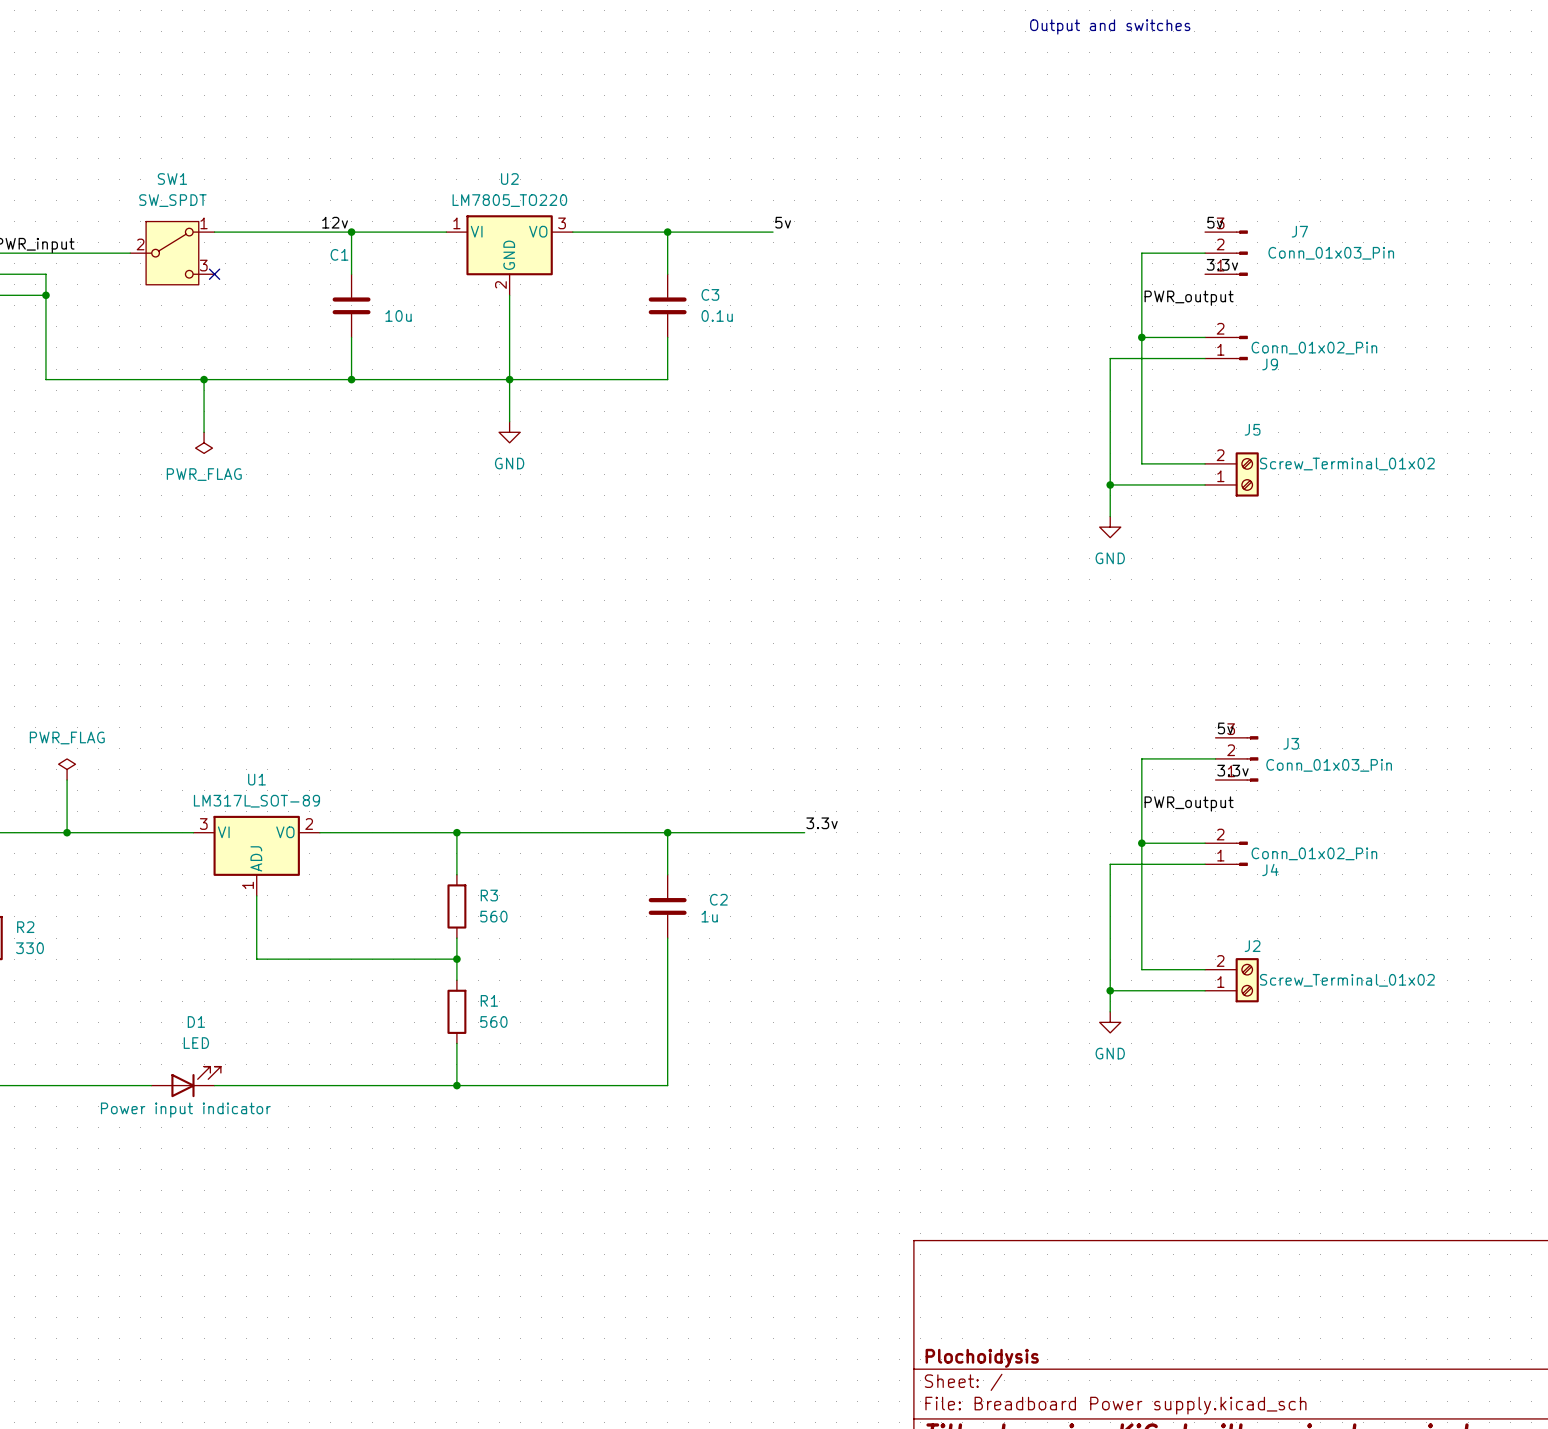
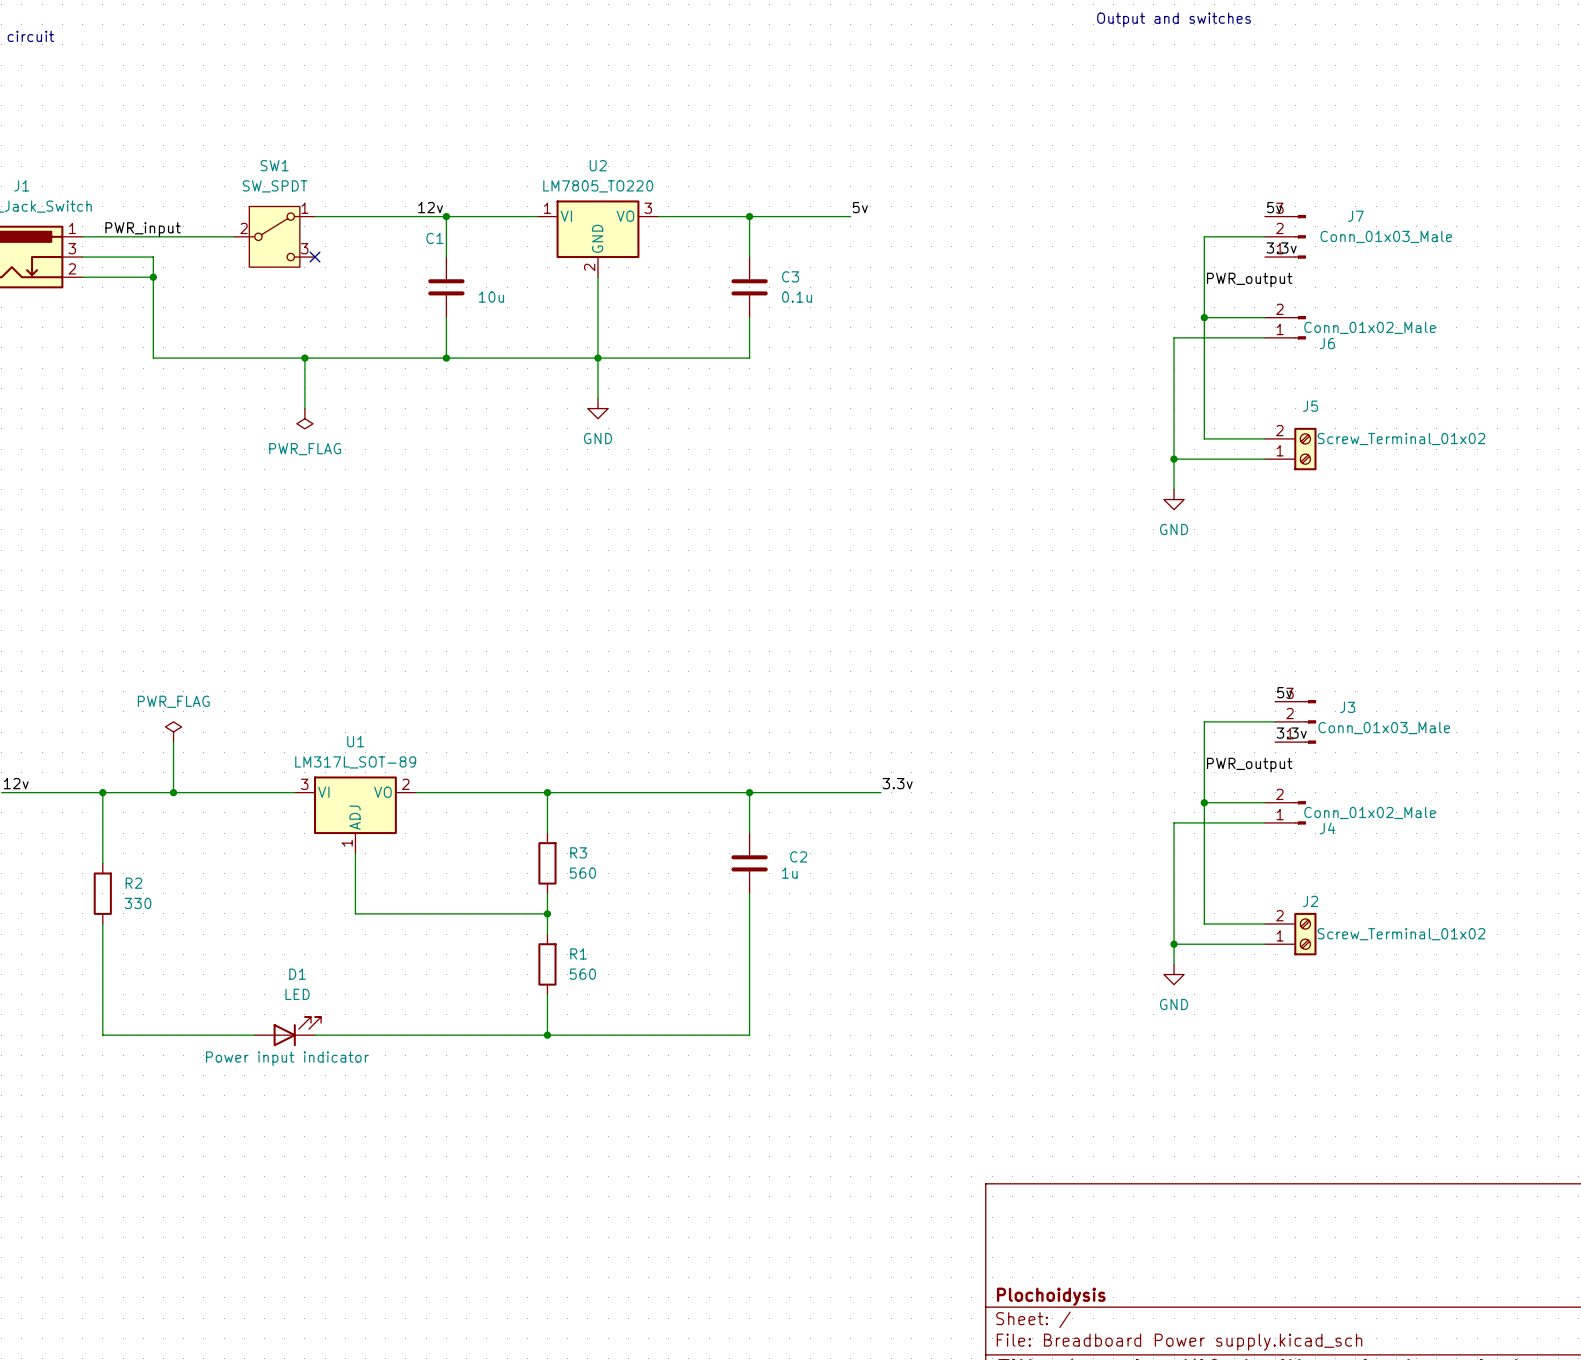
J7 value: Conn_01x03_Pin (1331, 253) -> Conn_01x03_Male (1386, 236)
J9 value: Conn_01x02_Pin (1314, 348) -> Conn_01x02_Male (1370, 327)
J9 name: J9 (1270, 364) -> J6 (1327, 343)
J3 value: Conn_01x03_Pin (1329, 765) -> Conn_01x03_Male (1384, 728)
J4 value: Conn_01x02_Pin (1314, 853) -> Conn_01x02_Male (1370, 812)

